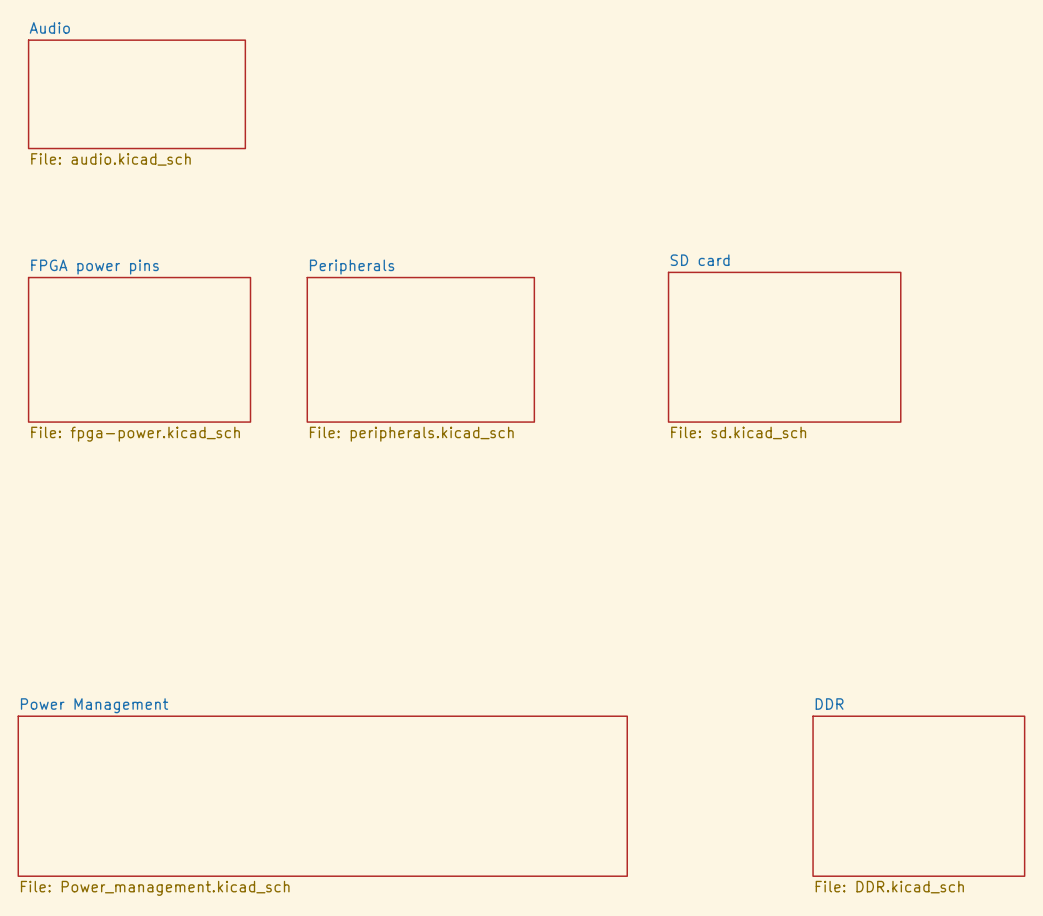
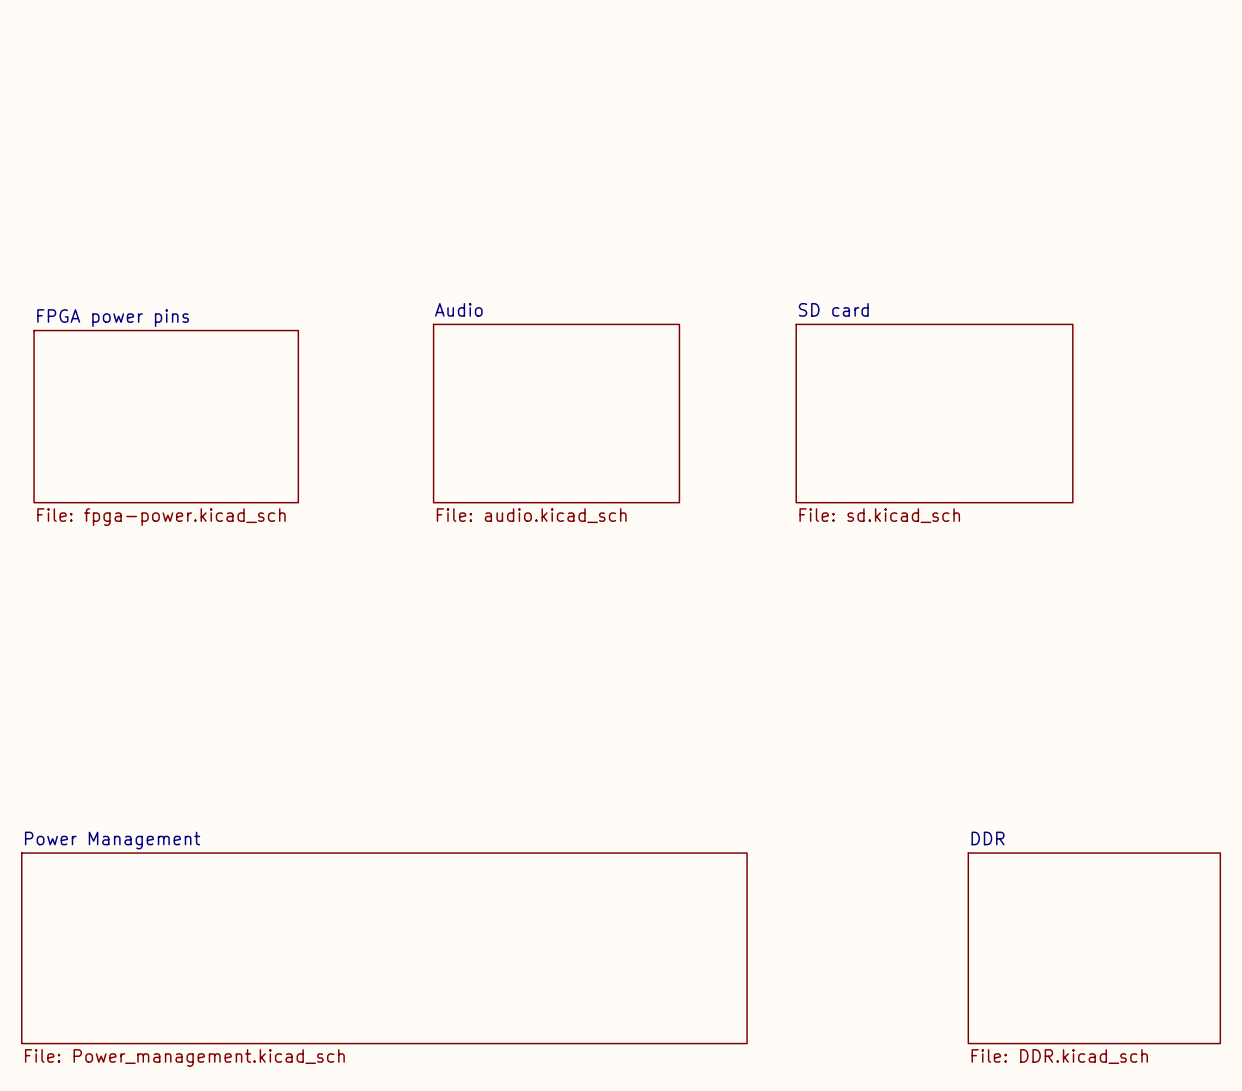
sheet Audio: File: audio.kicad_sch (136, 94) -> none
sheet Audio: none -> File: audio.kicad_sch (556, 413)
sheet Peripherals: File: peripherals.kicad_sch (420, 349) -> none

